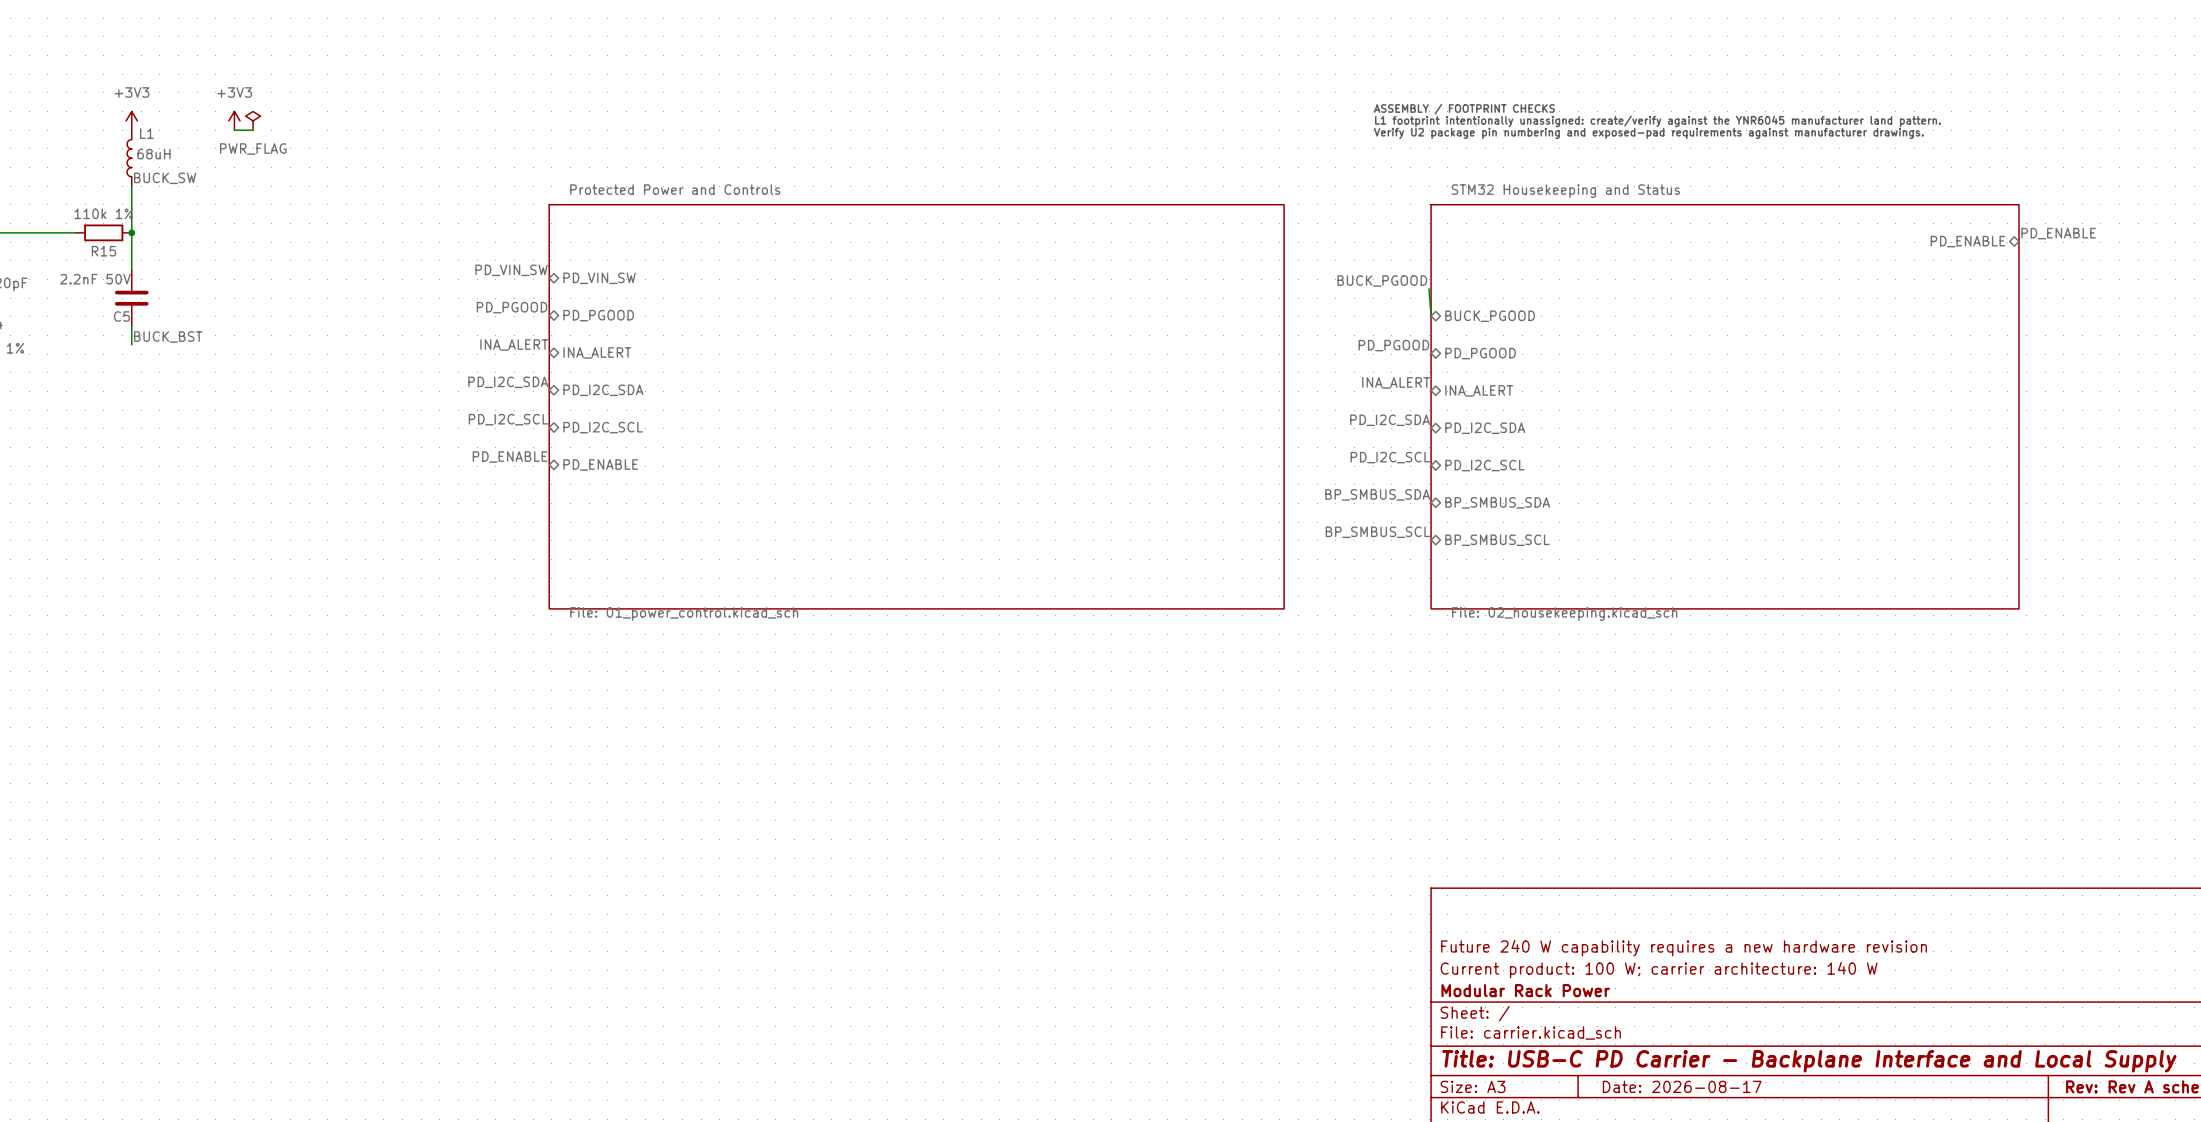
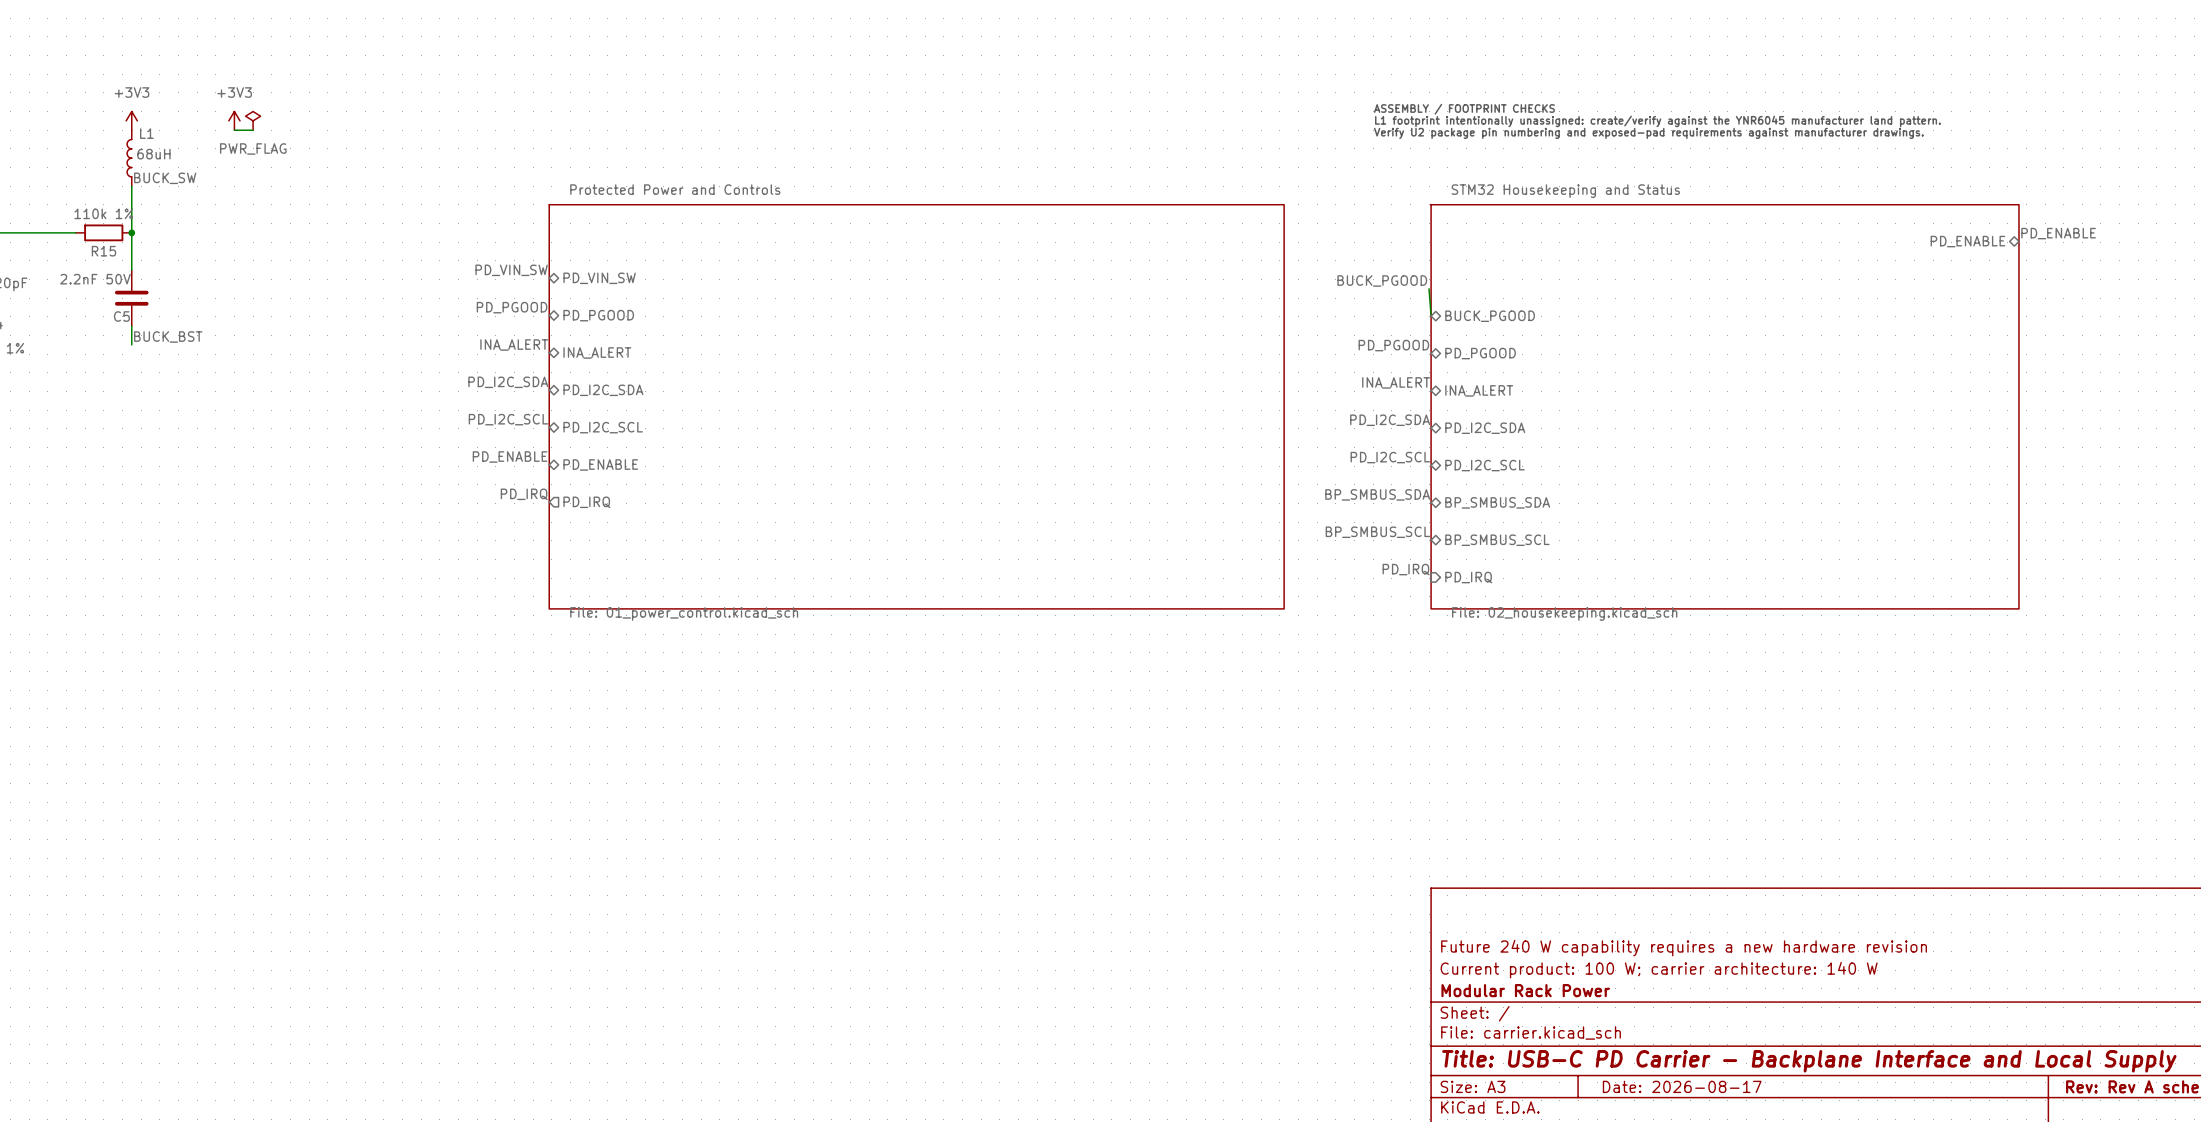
label: none -> PD_IRQ (524, 494)
sheet pin: none -> PD_IRQ (586, 502)
label: none -> PD_IRQ (1406, 569)
sheet pin: none -> PD_IRQ (1468, 577)

